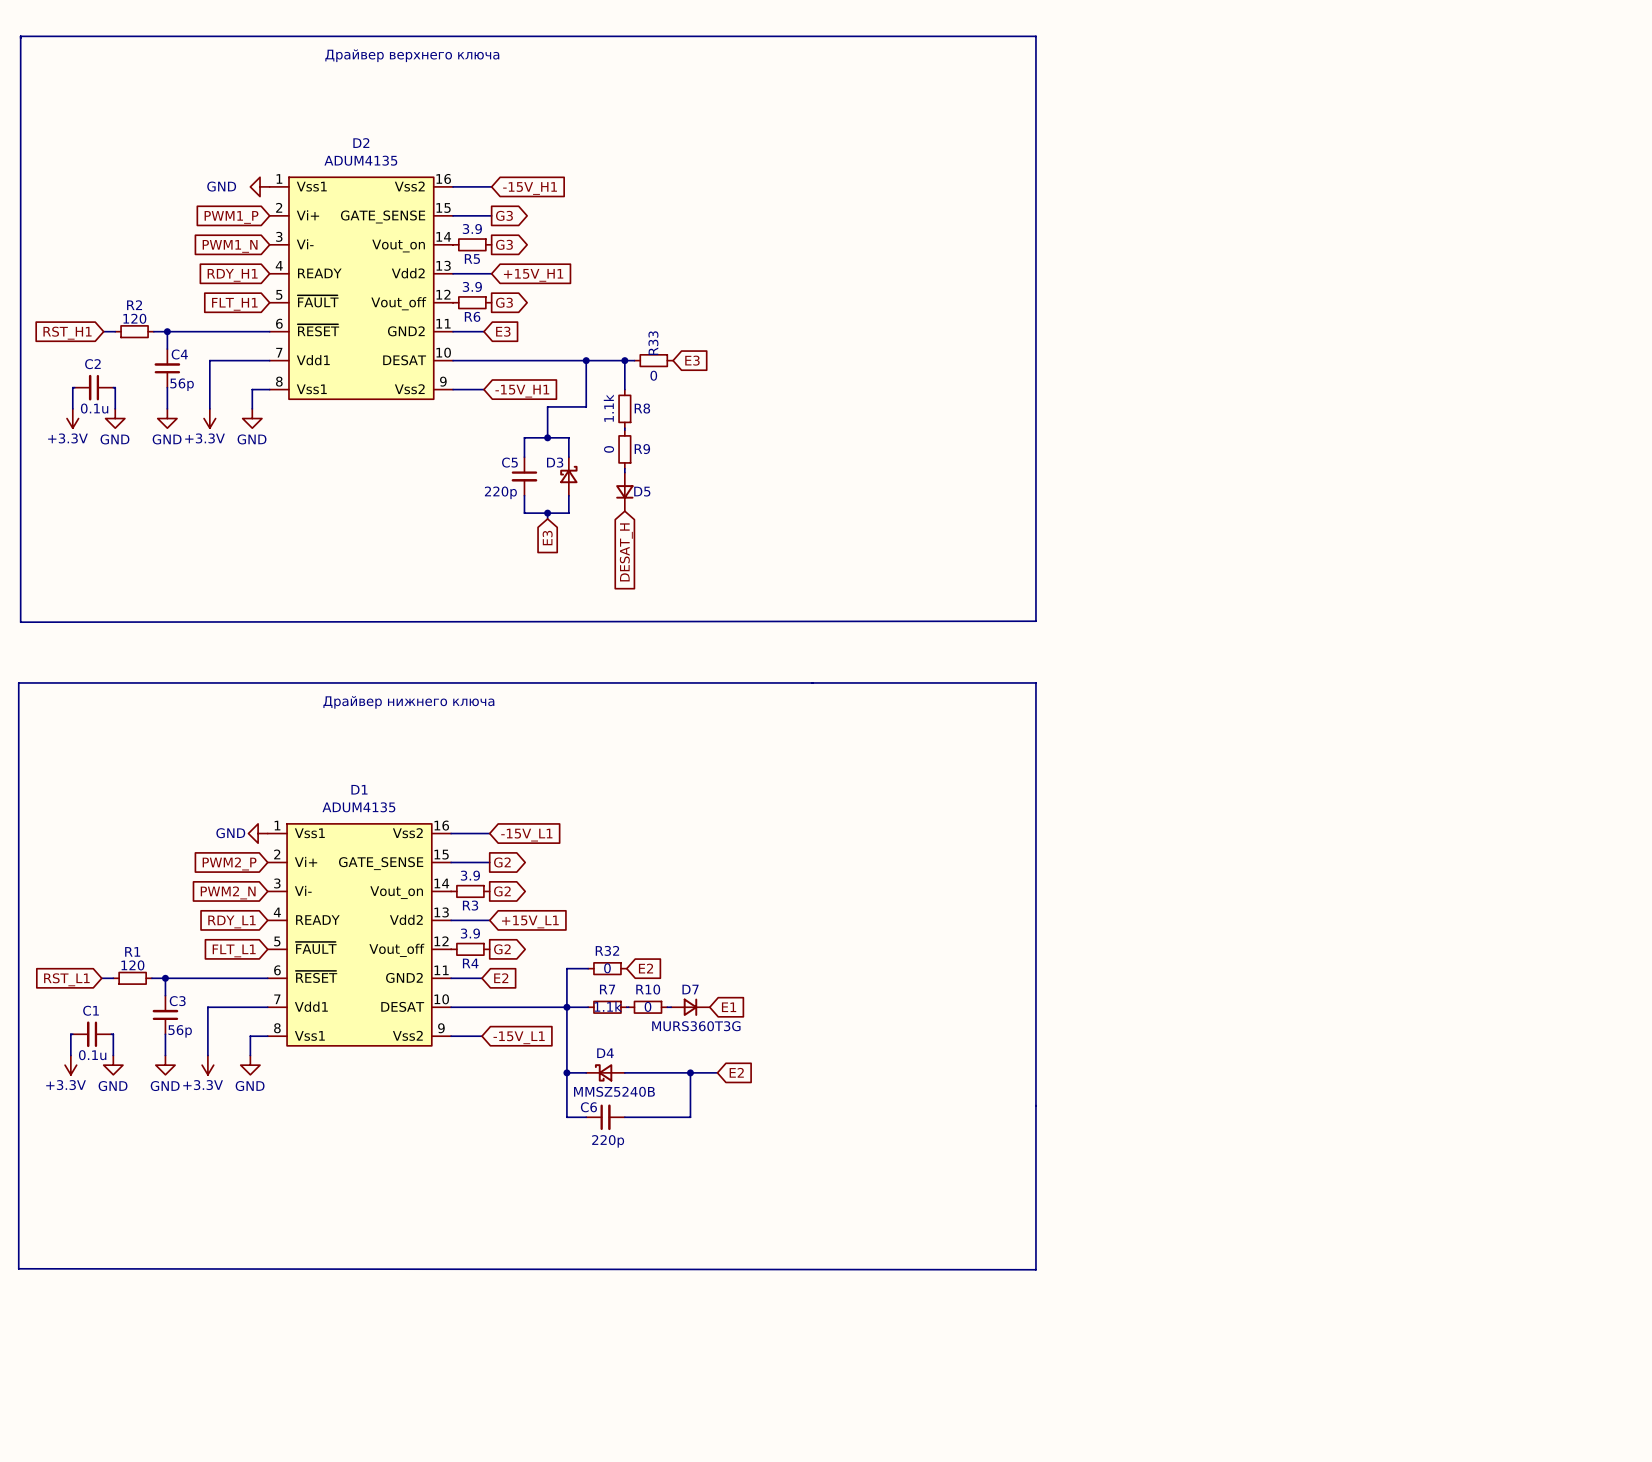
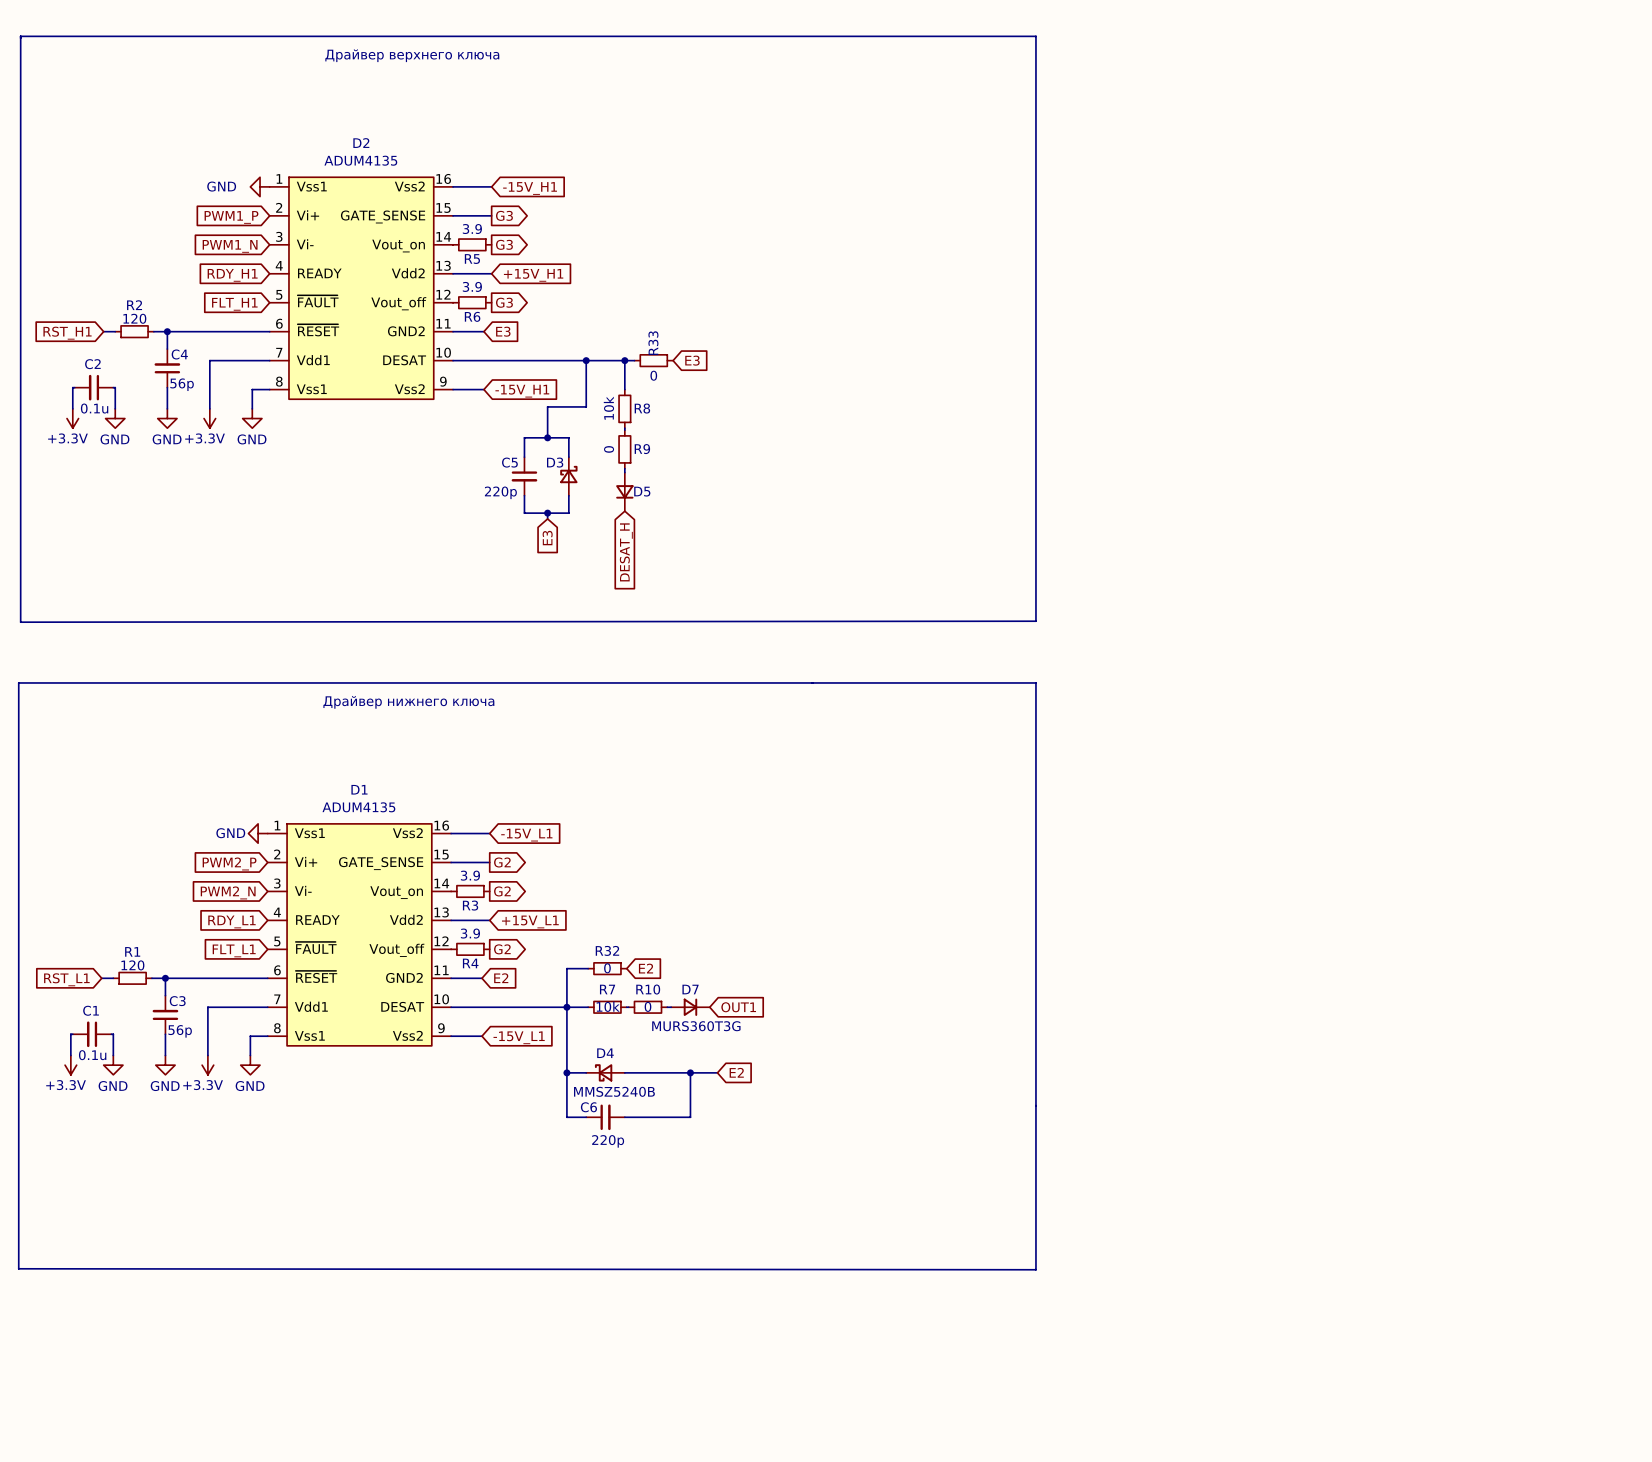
R8 value: 1.1k (608, 408) -> 10k (608, 408)
R7 value: 1.1k (608, 1006) -> 10k (608, 1006)
global label: E1 (729, 1007) -> OUT1 (738, 1007)

